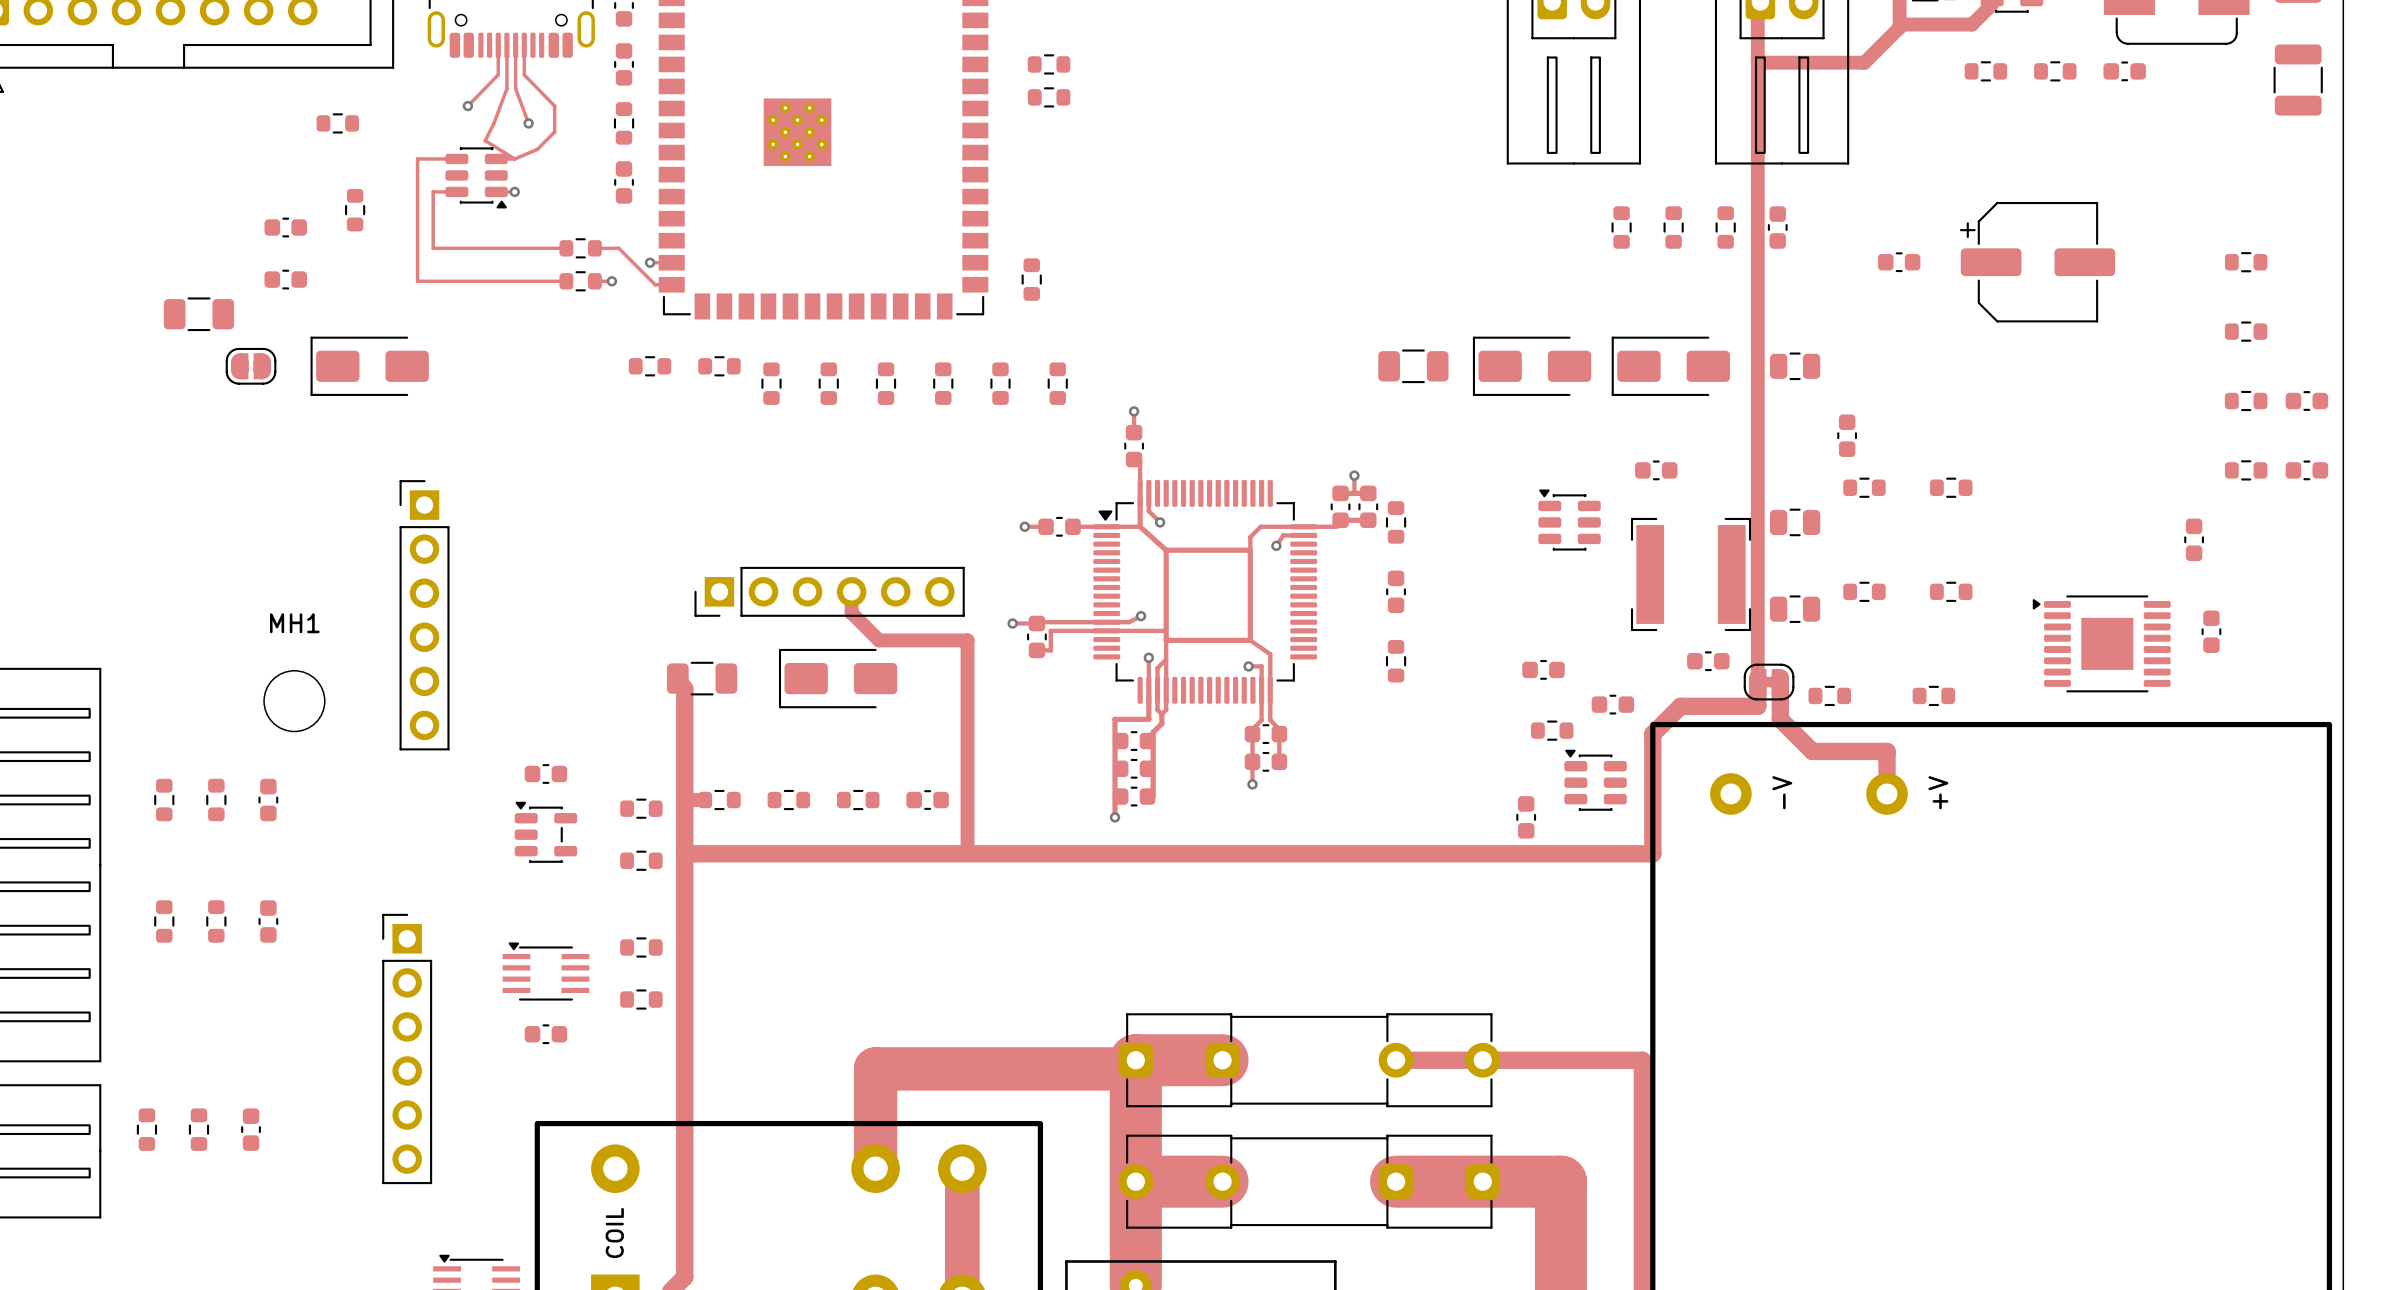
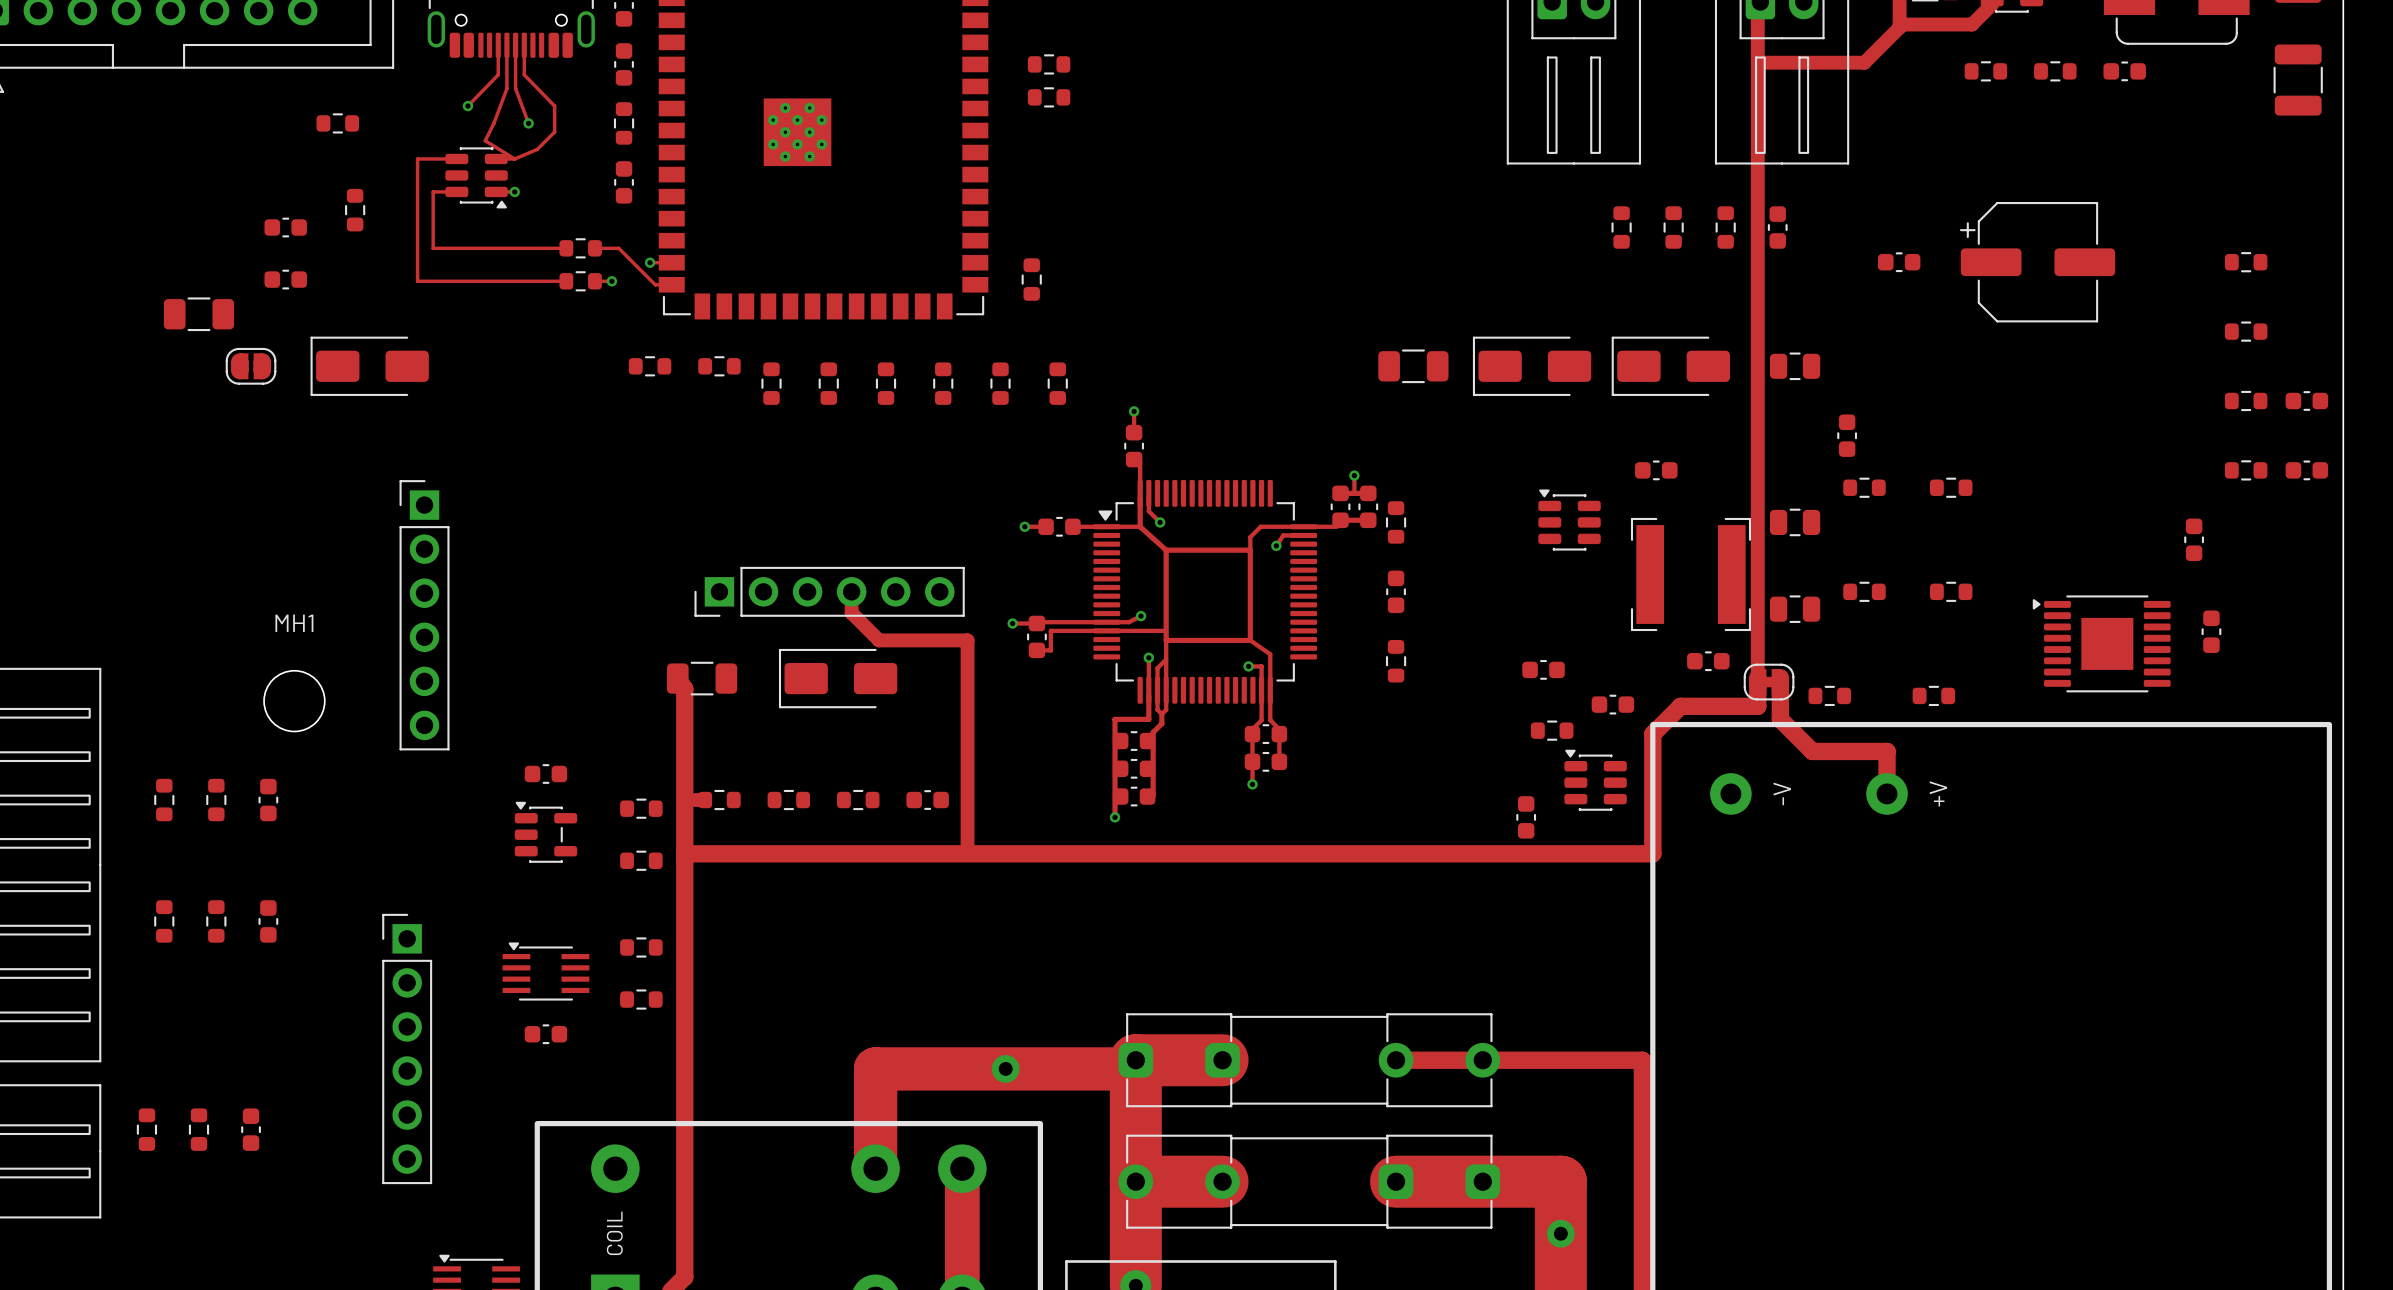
via: none -> (1005, 1068)
via: none -> (1560, 1233)

